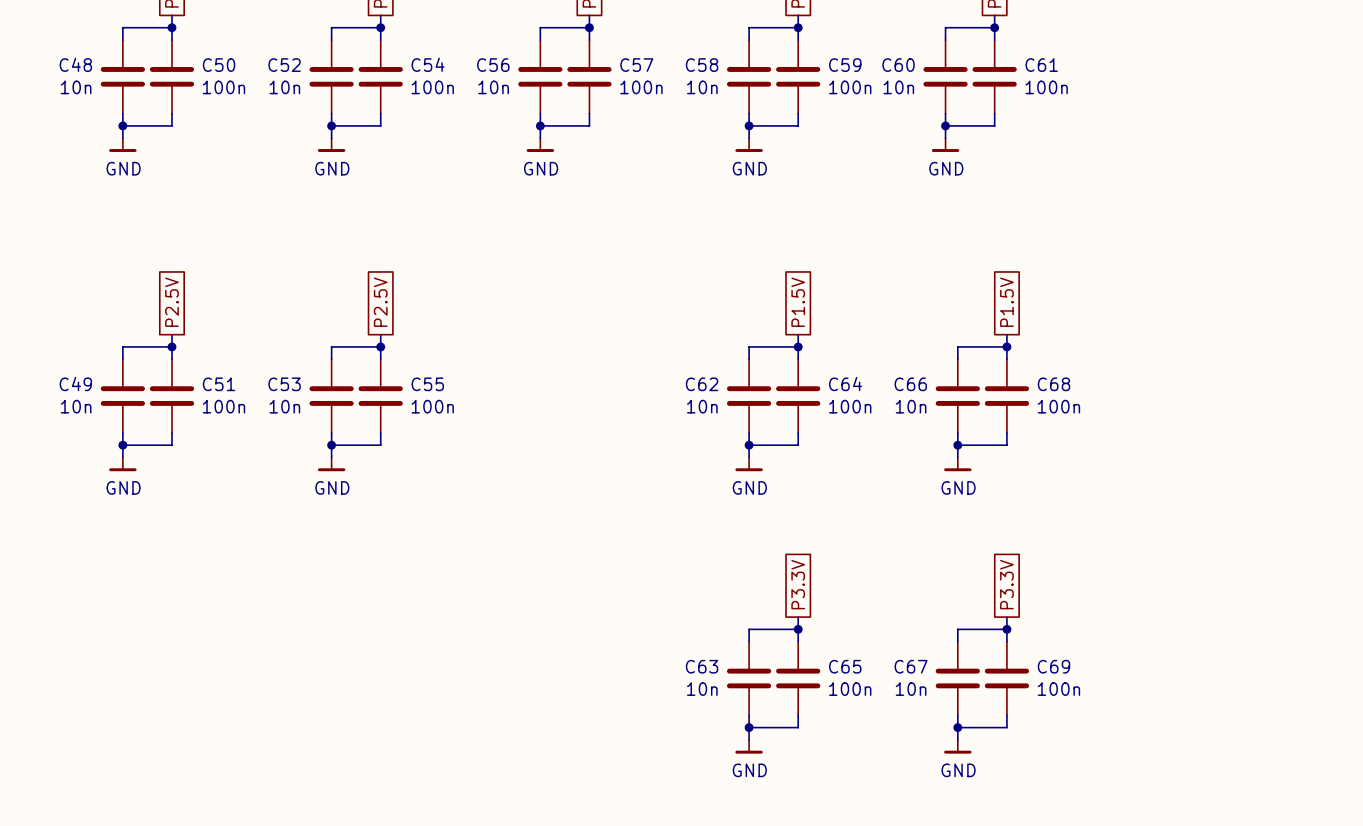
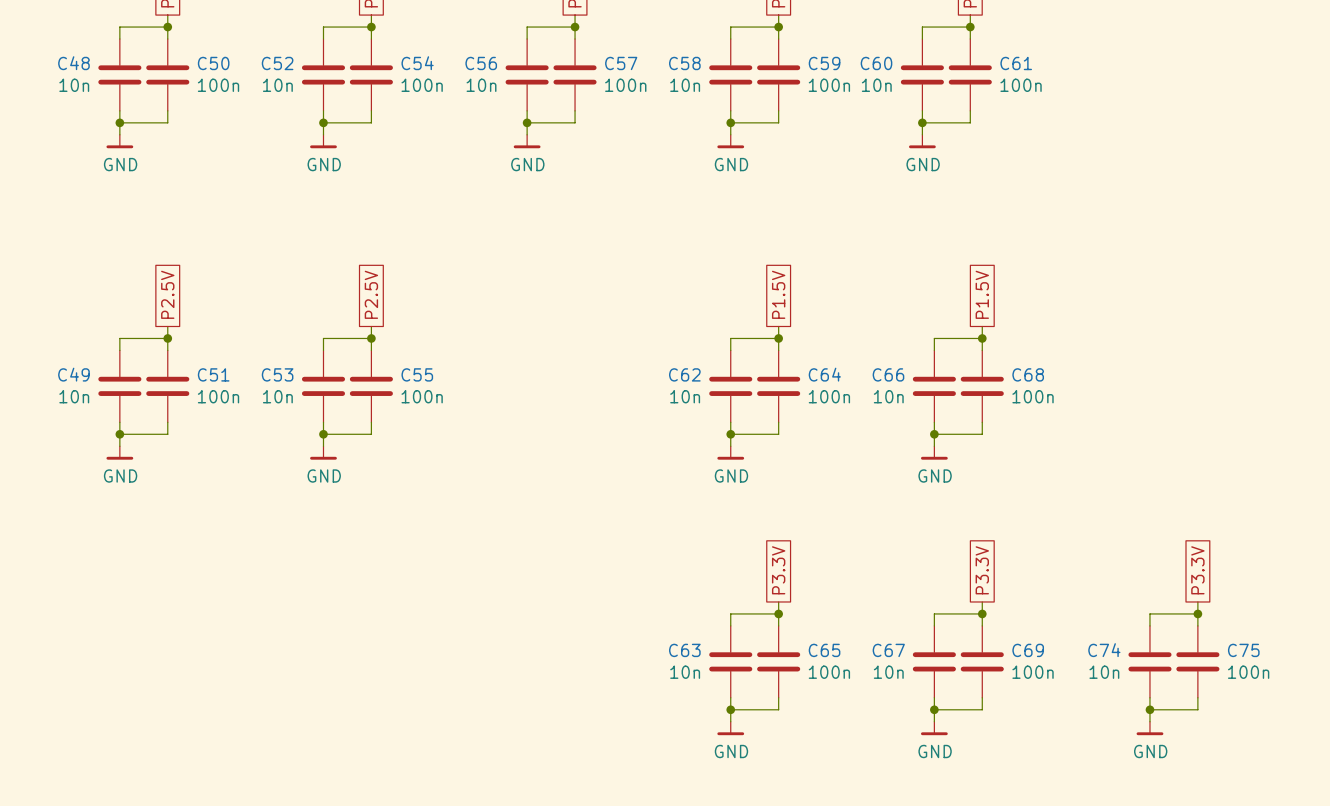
global label: none -> P3.3V (1197, 570)
wire: none -> (1197, 601) (1197, 625)
wire: none -> (1197, 613) (1149, 613) (1149, 625)
junction: none -> (1197, 613)
C74: none -> 10n (1149, 661)
C75: none -> 100n (1197, 661)
wire: none -> (1149, 697) (1149, 721)
wire: none -> (1197, 697) (1197, 709) (1149, 709)
junction: none -> (1149, 709)
power symbol: none -> GND (1149, 728)

